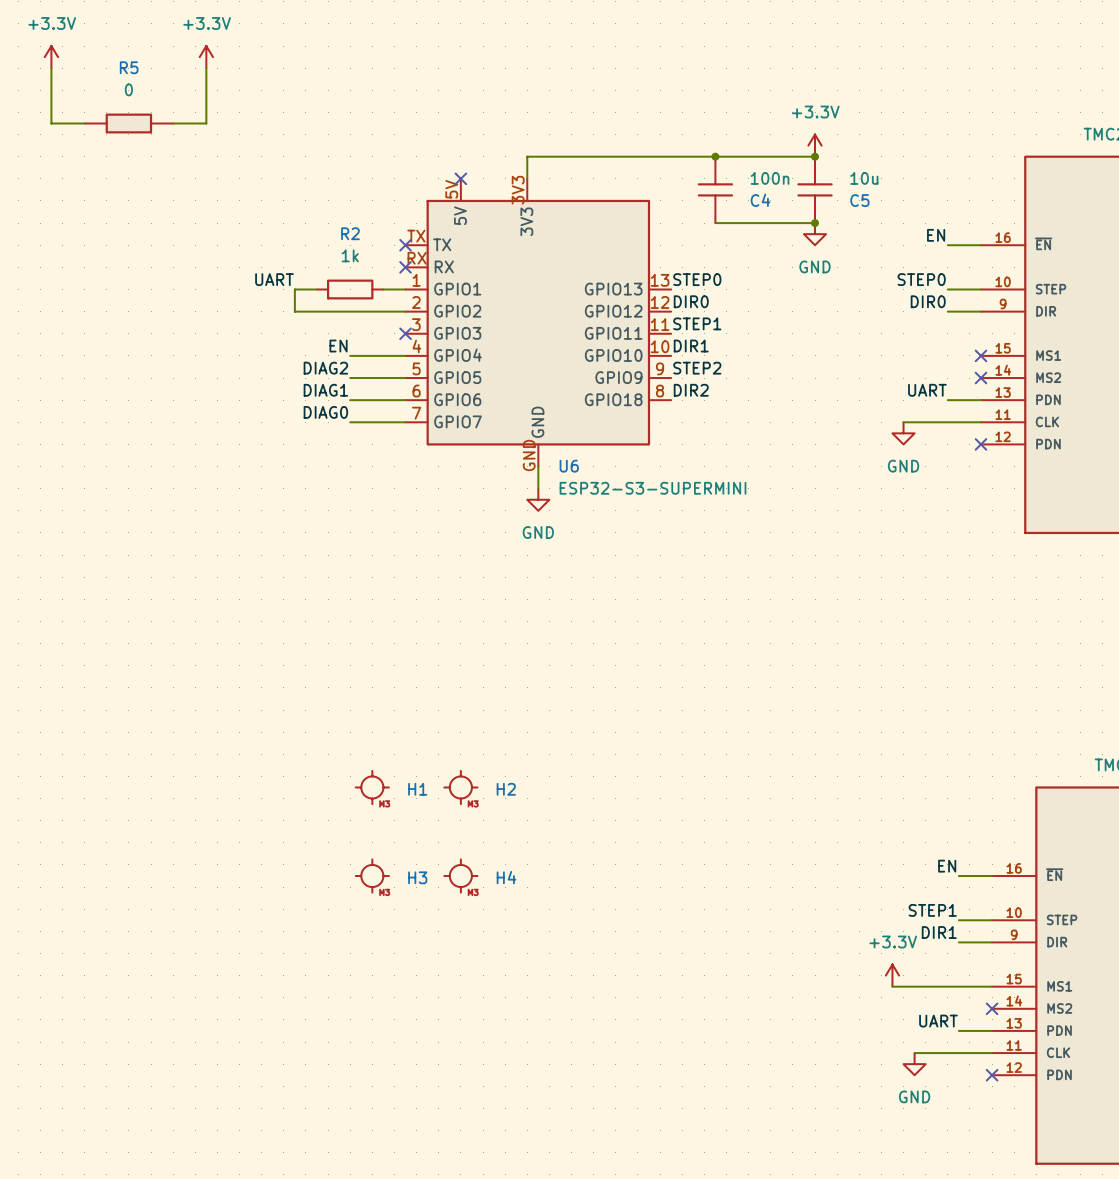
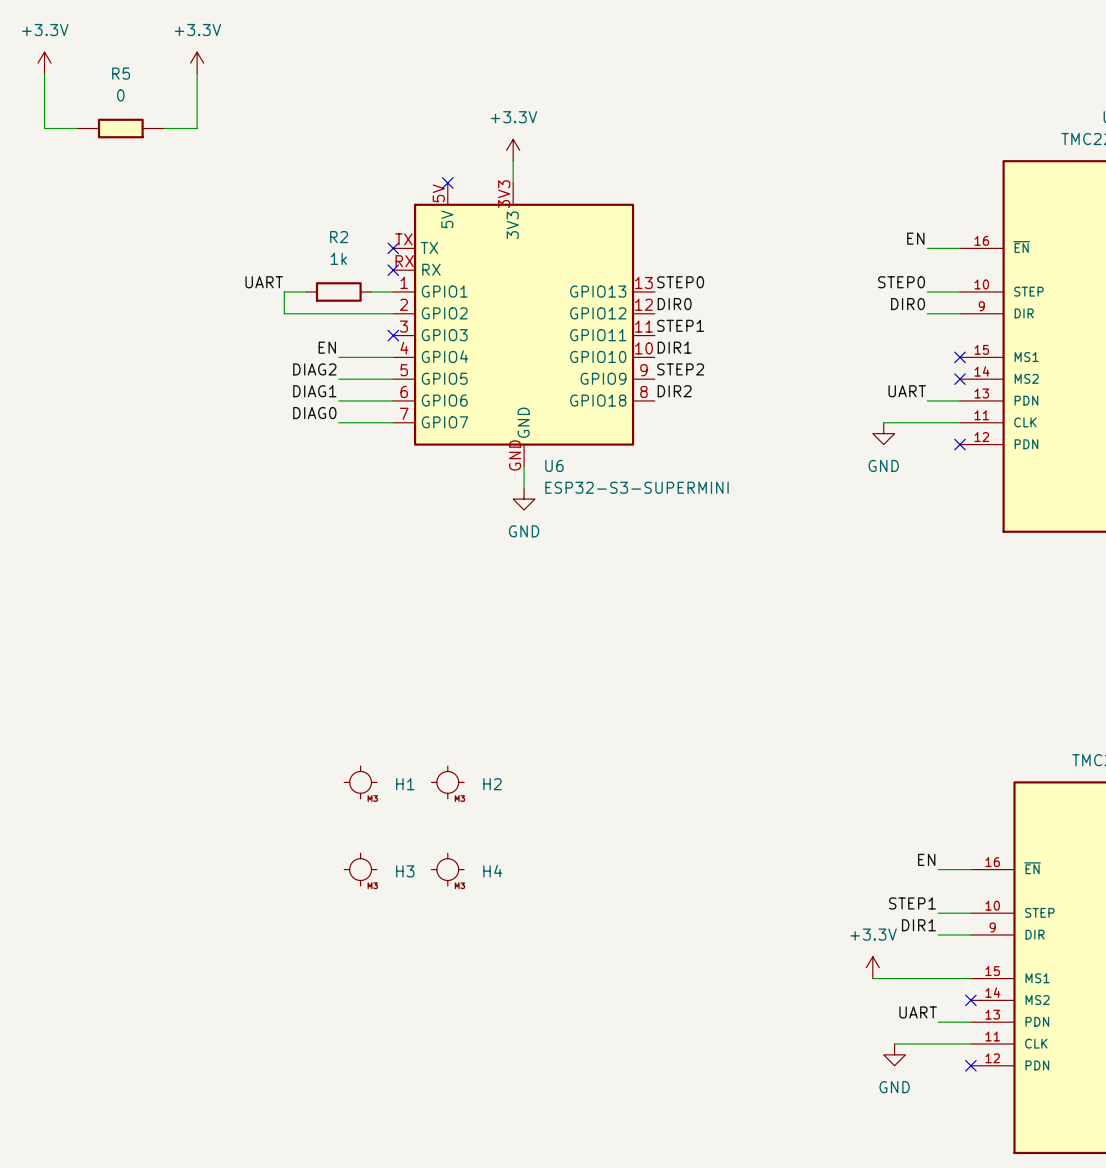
power symbol: none -> +3.3V (513, 150)
power symbol: +3.3V (815, 145) -> none
wire: (527, 156) (815, 156) -> none
junction: (715, 156) -> none
junction: (815, 156) -> none
C4: 100n (715, 189) -> none
C5: 10u (815, 189) -> none
wire: (715, 223) (815, 223) -> none
junction: (815, 223) -> none
power symbol: GND (815, 234) -> none

